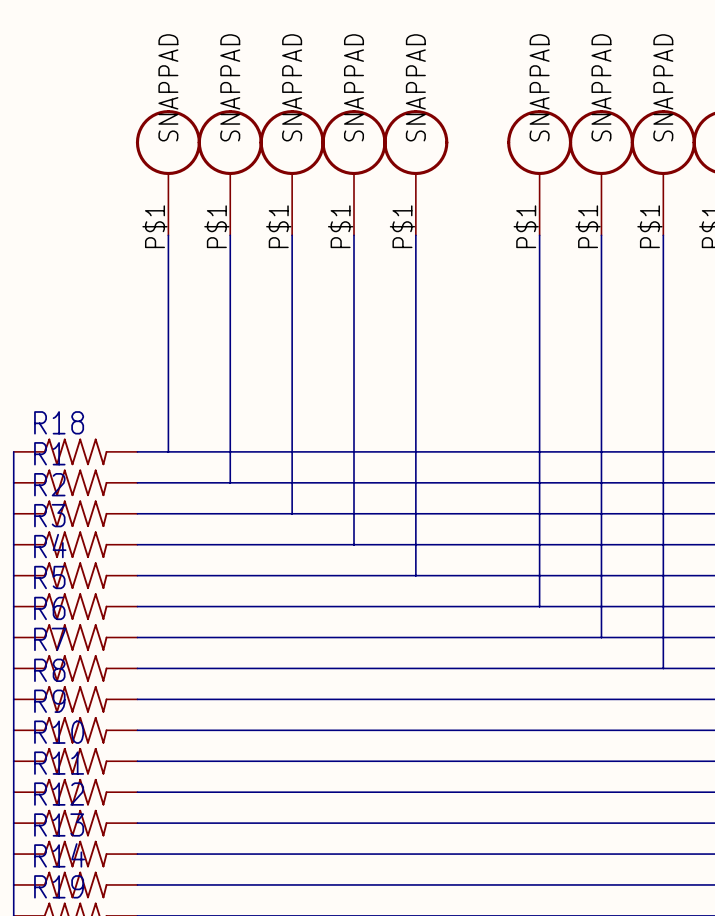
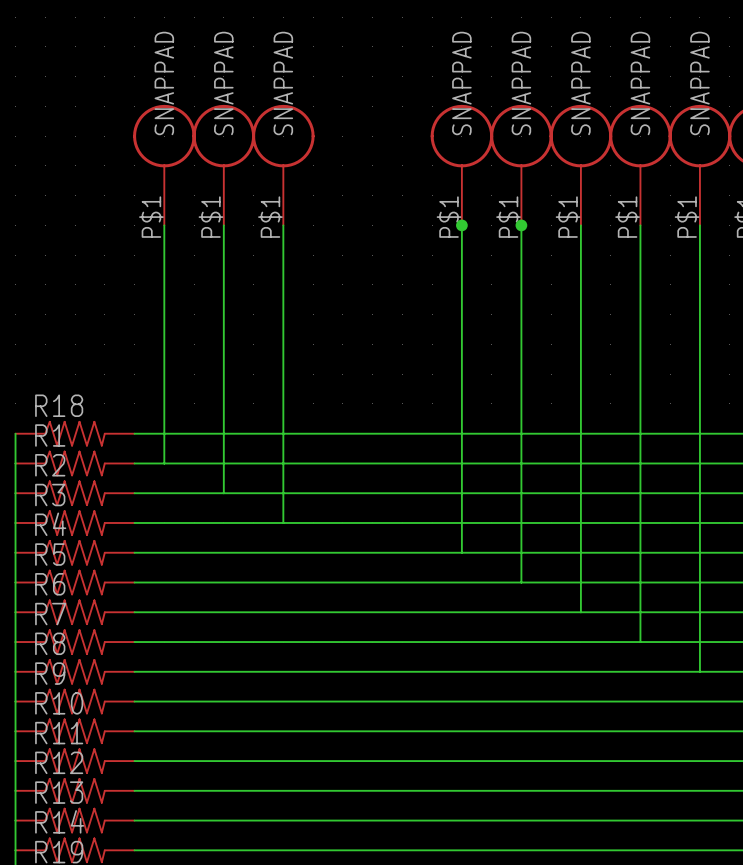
part: (354, 172) -> none
part: (415, 172) -> none
part: none -> (461, 165)
wire: (354, 235) (354, 544) -> none
wire: (415, 235) (415, 575) -> (461, 225) (461, 552)
junction: none -> (461, 225)
junction: none -> (521, 225)
wire: none -> (164, 433) (164, 463)
wire: none -> (223, 463) (223, 493)
wire: none -> (283, 493) (283, 522)

